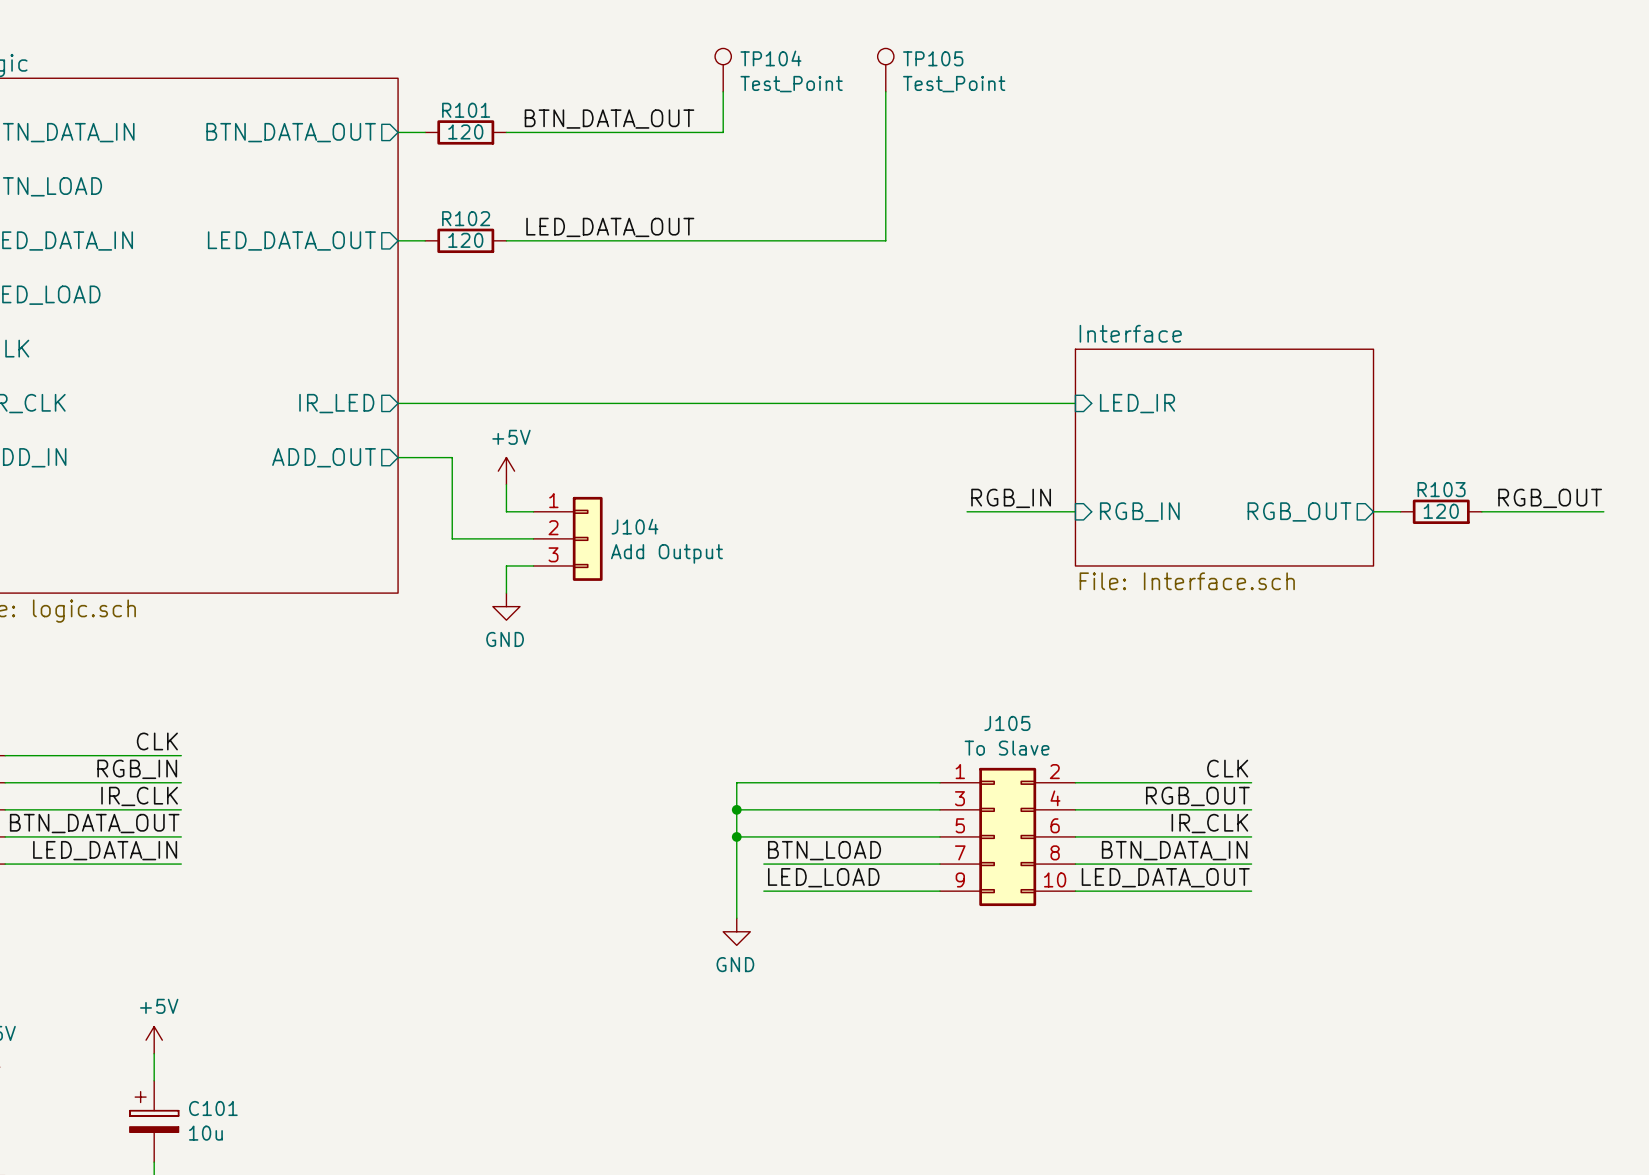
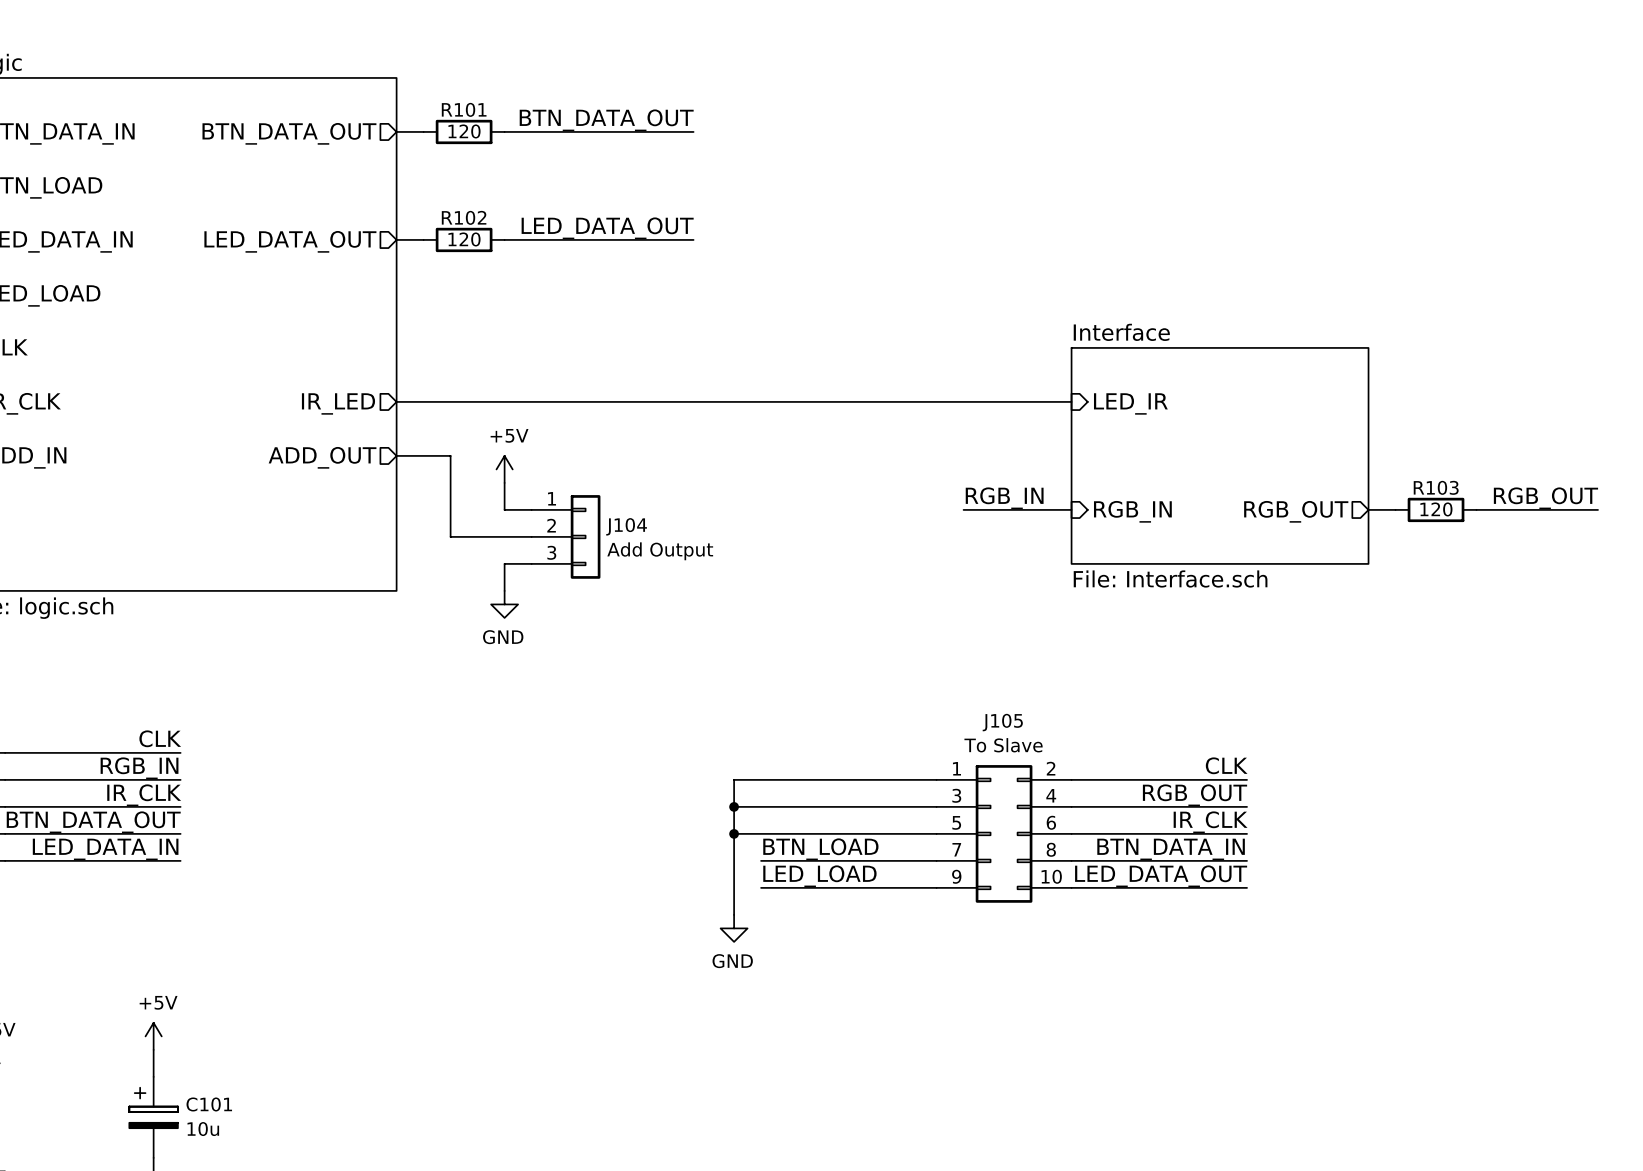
TP104: Test_Point (723, 70) -> none
TP105: Test_Point (885, 70) -> none
wire: (723, 91) (723, 132) (696, 132) -> none
wire: (885, 91) (885, 240) (696, 240) -> none

